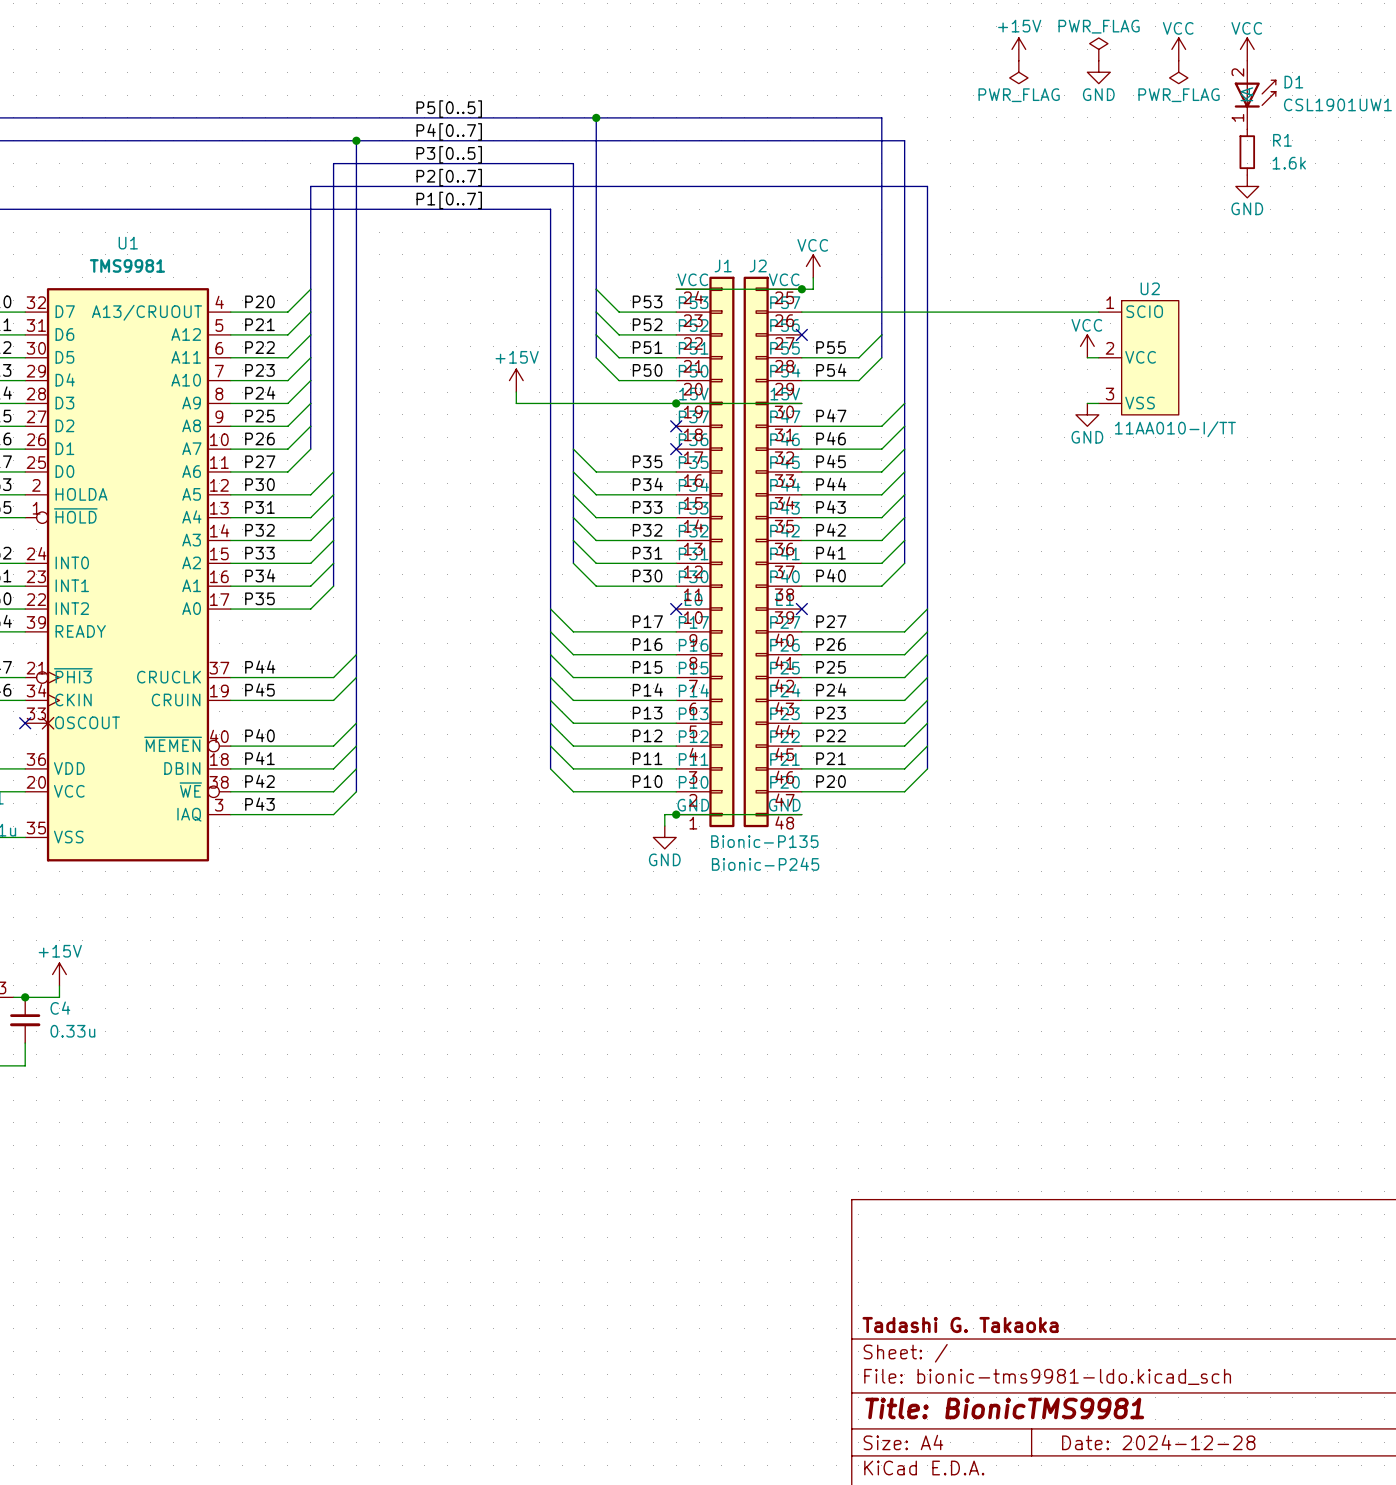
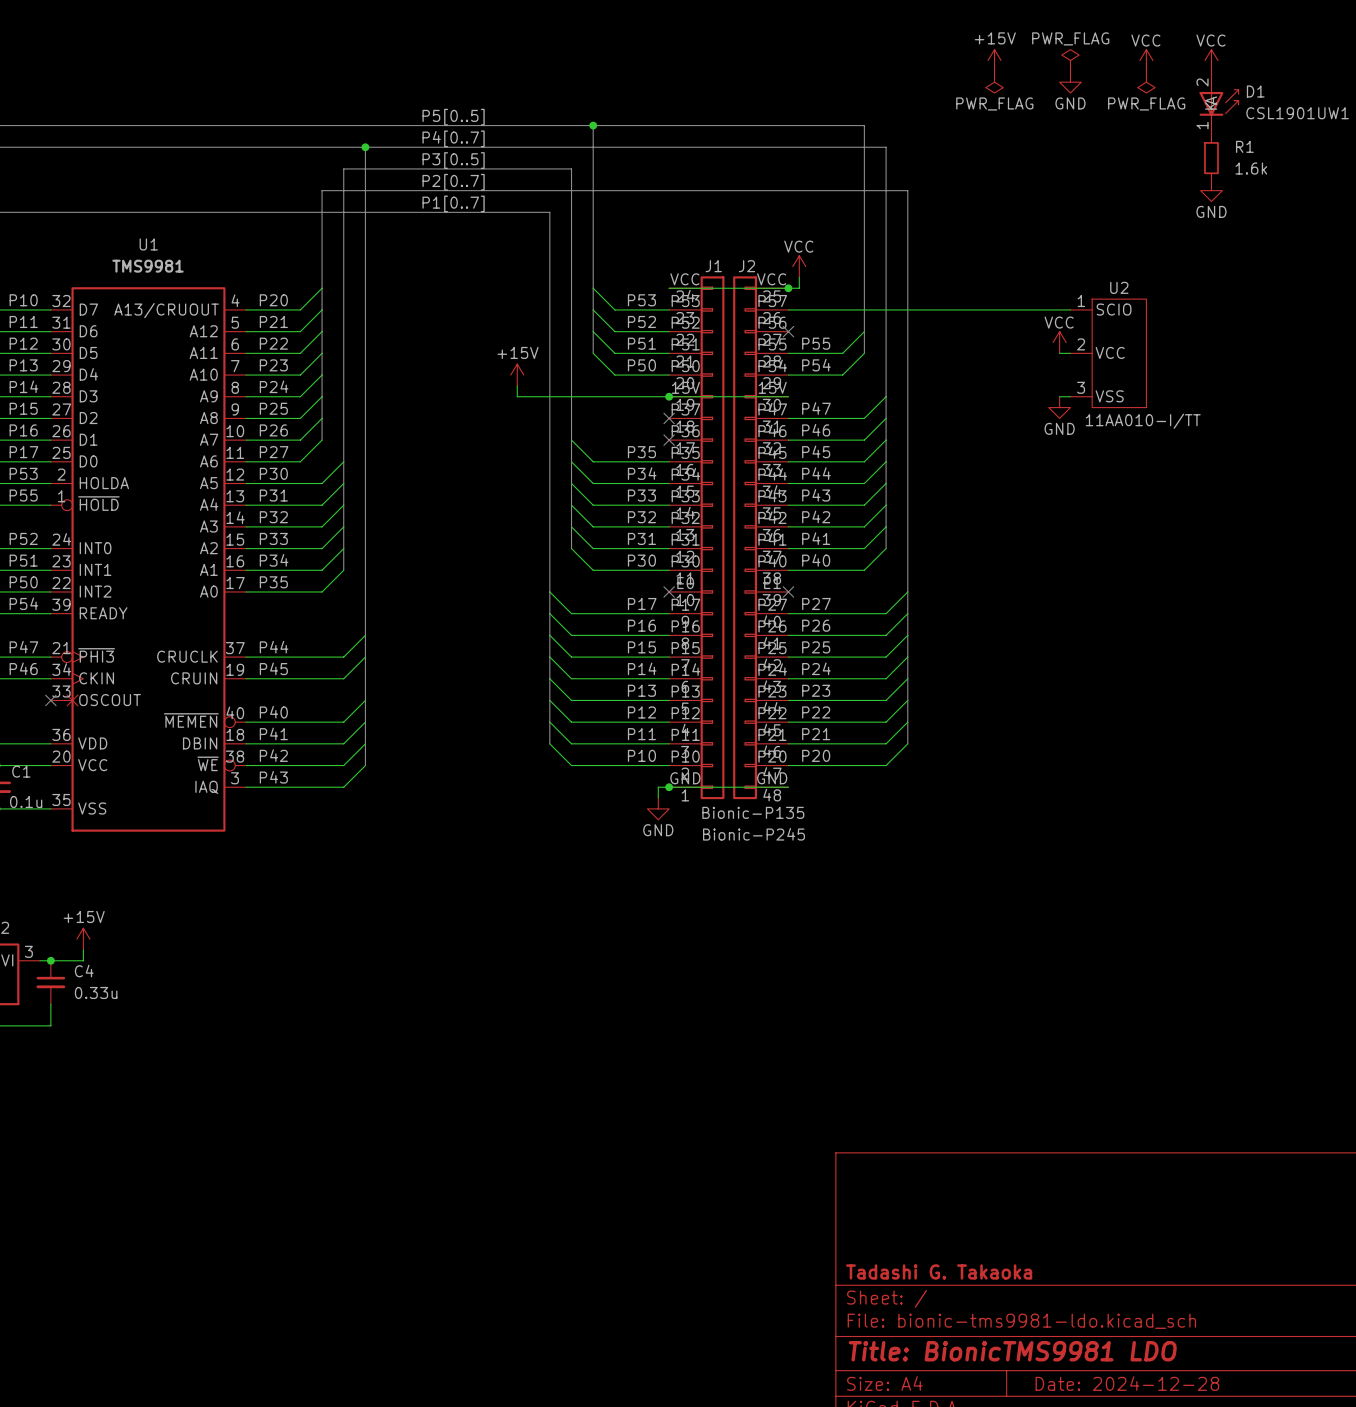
title block: Title: BionicTMS9981 (1004, 1408) -> Title: BionicTMS9981 LDO (1012, 1351)

